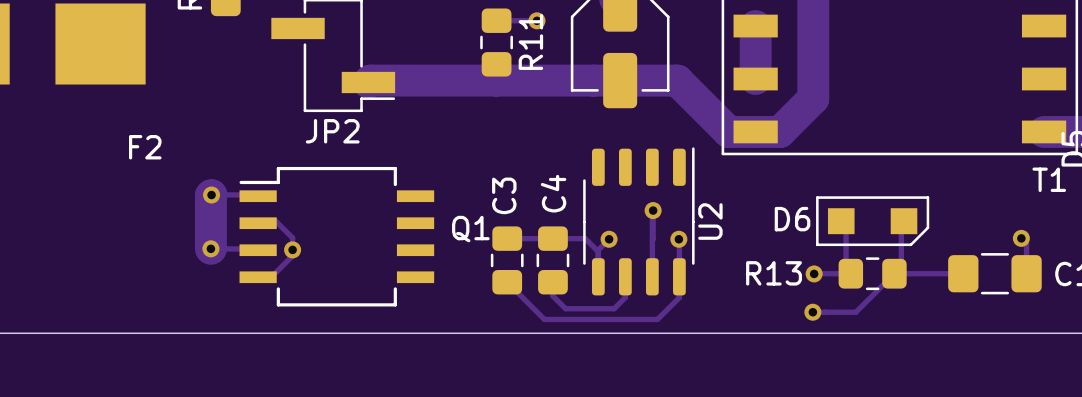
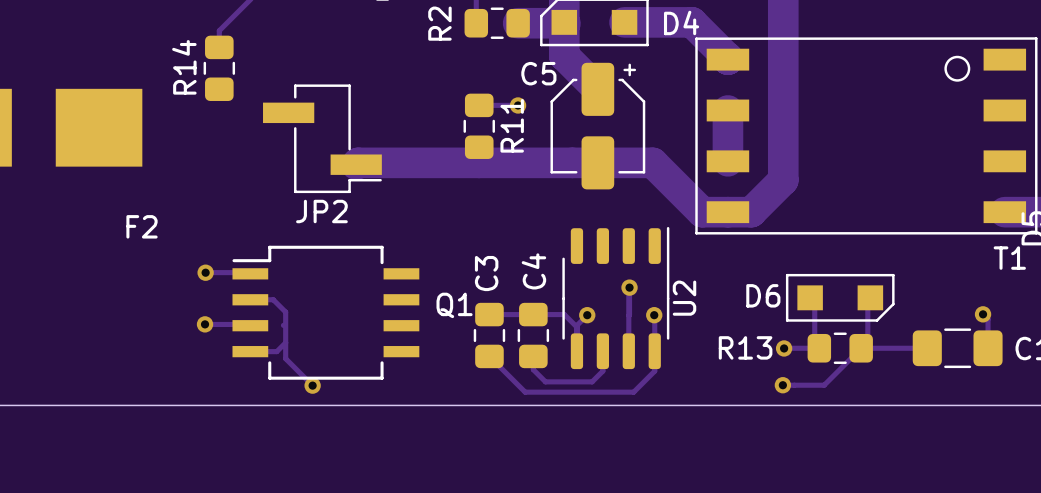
track: (211, 195) (210, 248) -> none
track: (252, 221) (276, 221) (292, 237) (292, 255) (272, 275) -> none
track: none -> (250, 299) (273, 299) (285, 312) (285, 358) (312, 385)
via position: (292, 249) -> (312, 385)
track: none -> (285, 342) (276, 351) (250, 351)

